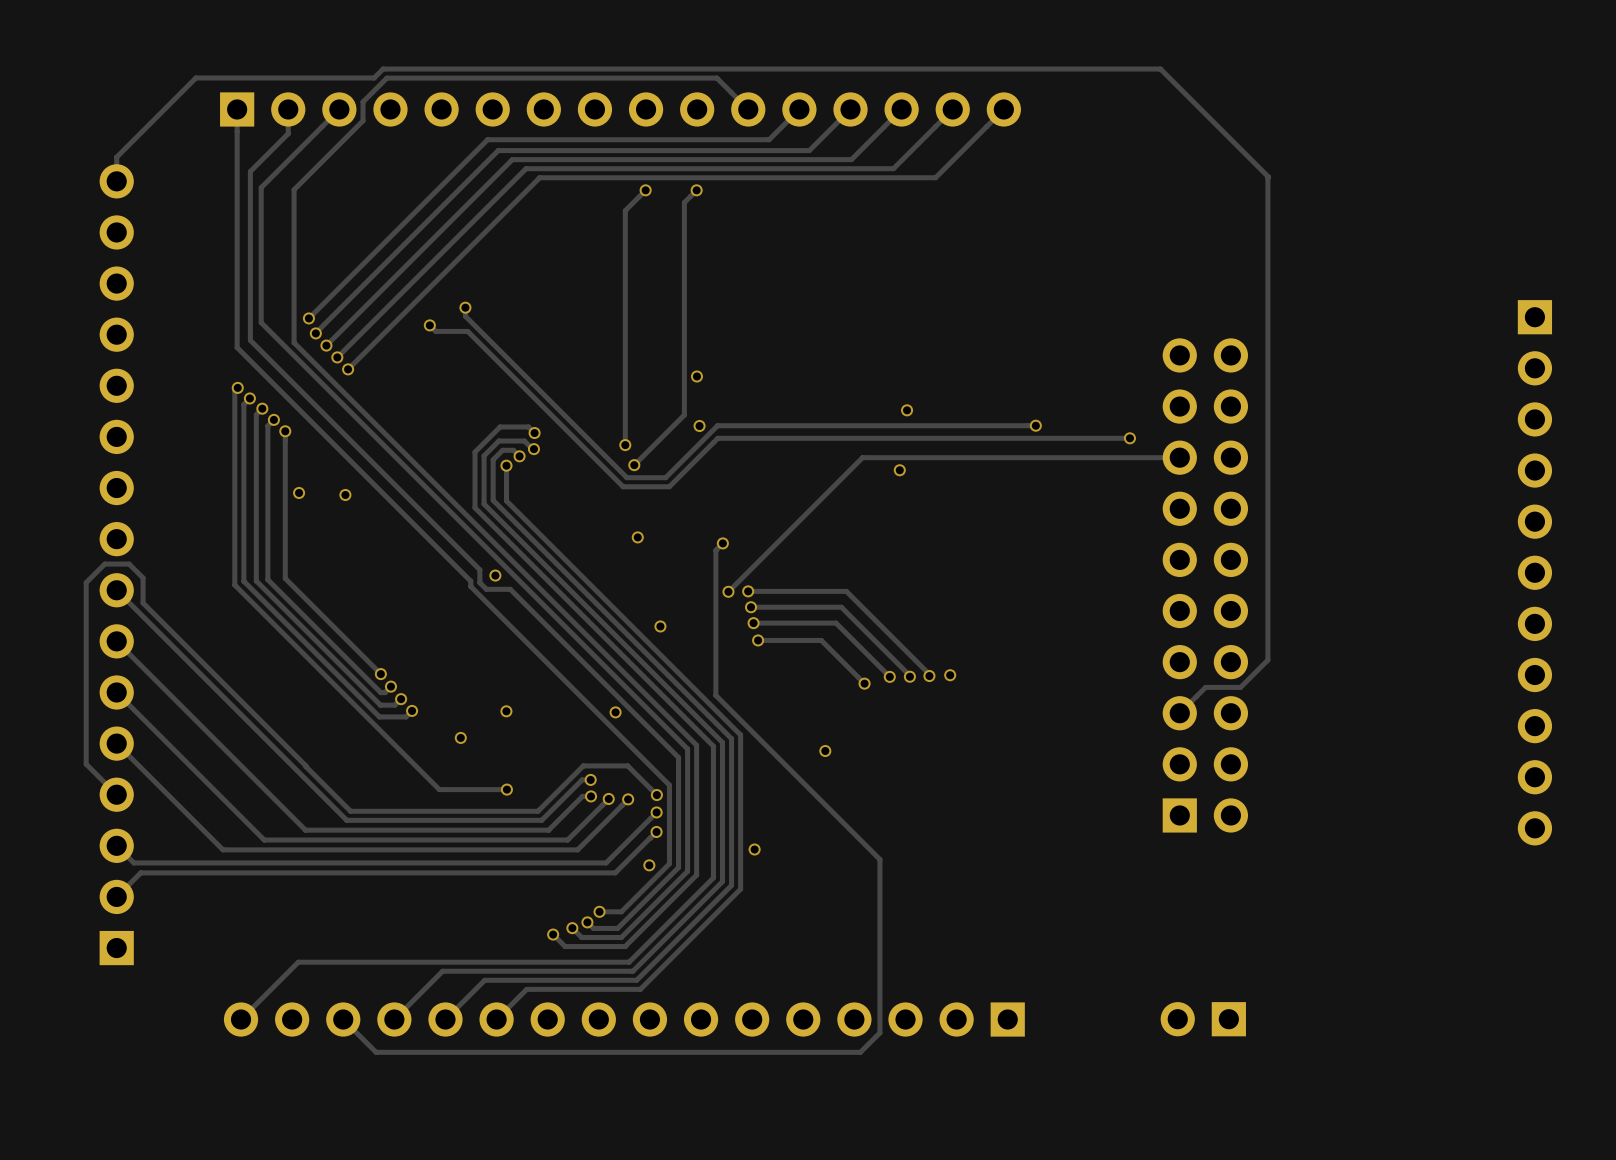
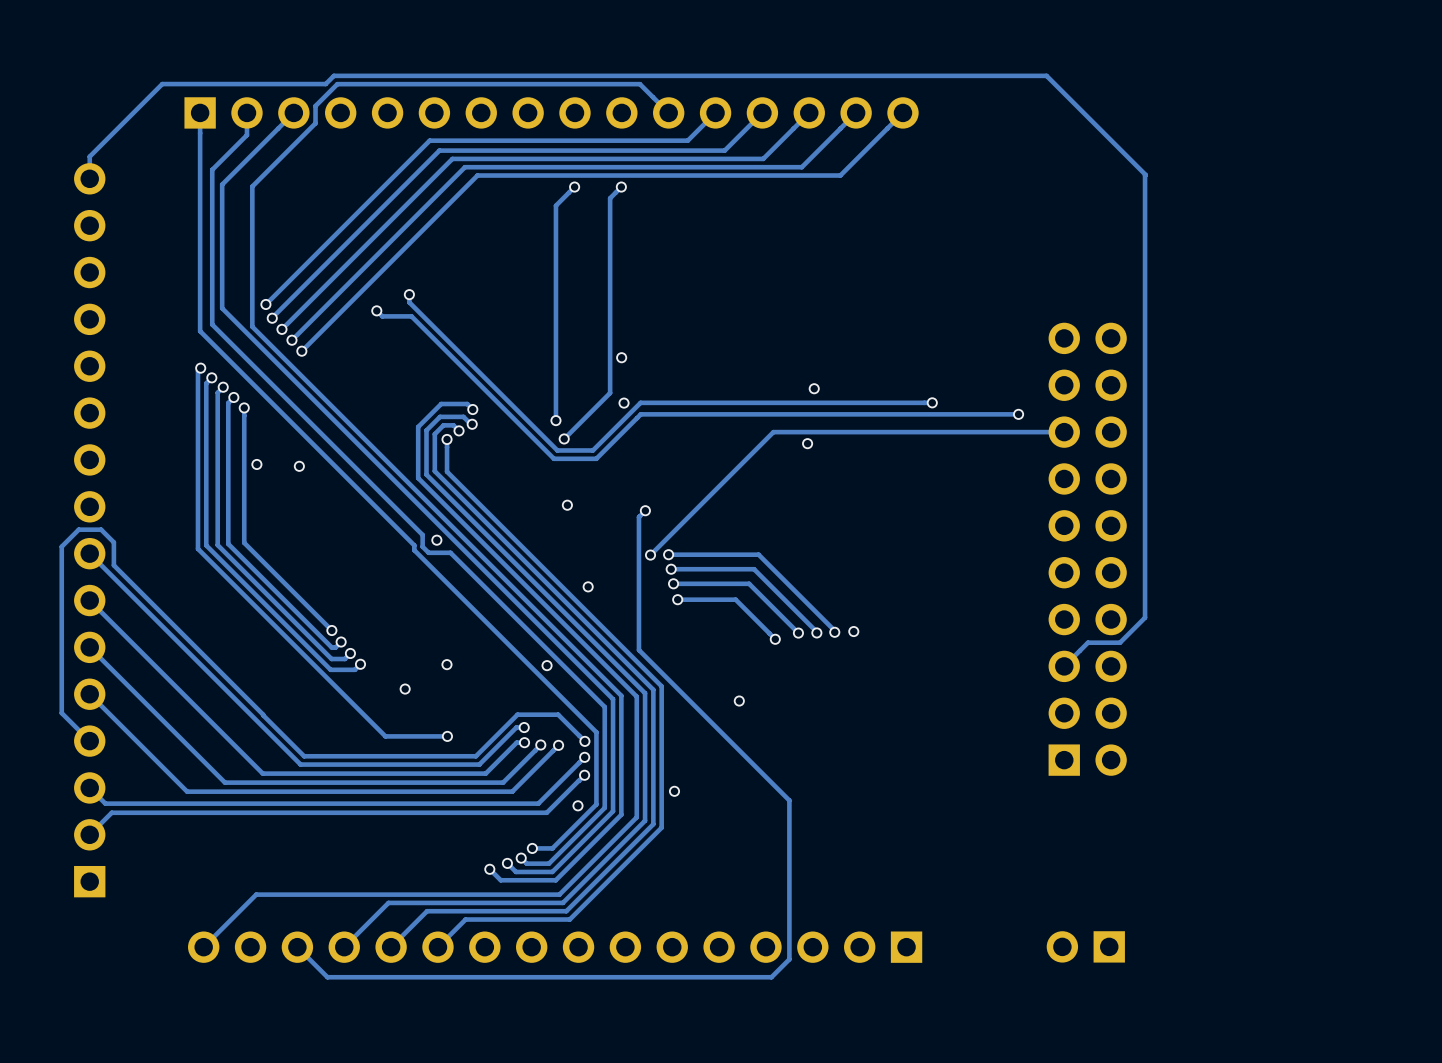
part: (1534, 572) -> none

